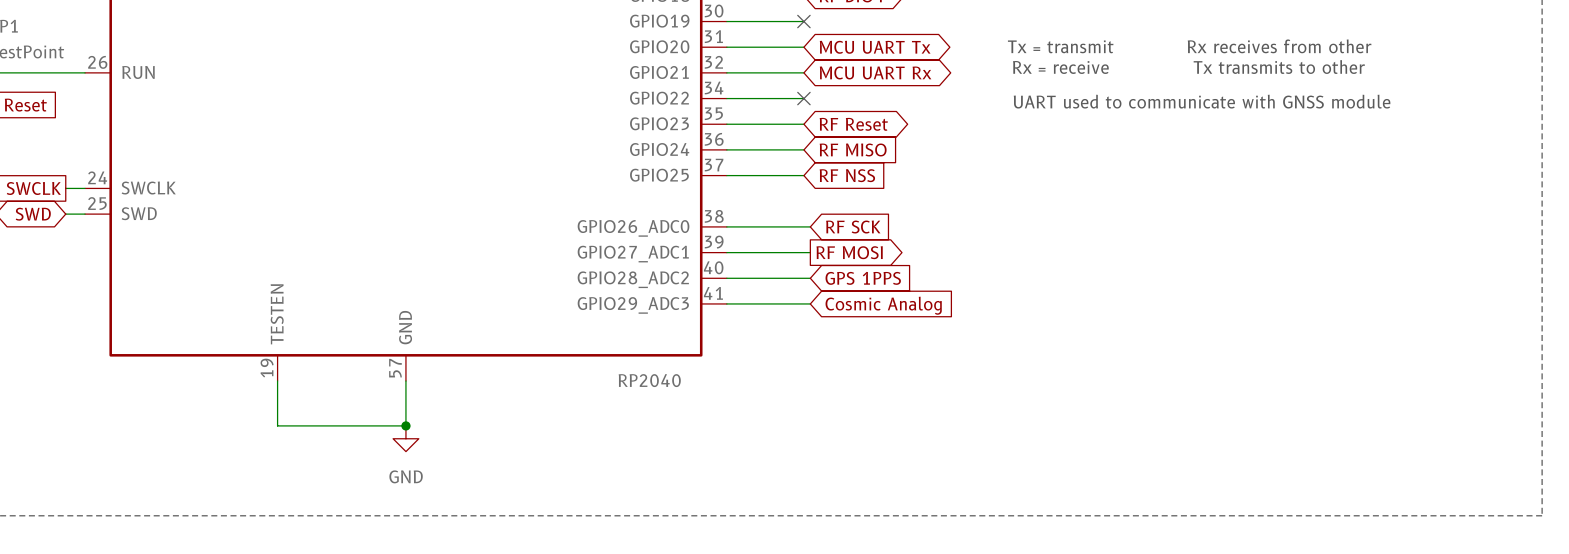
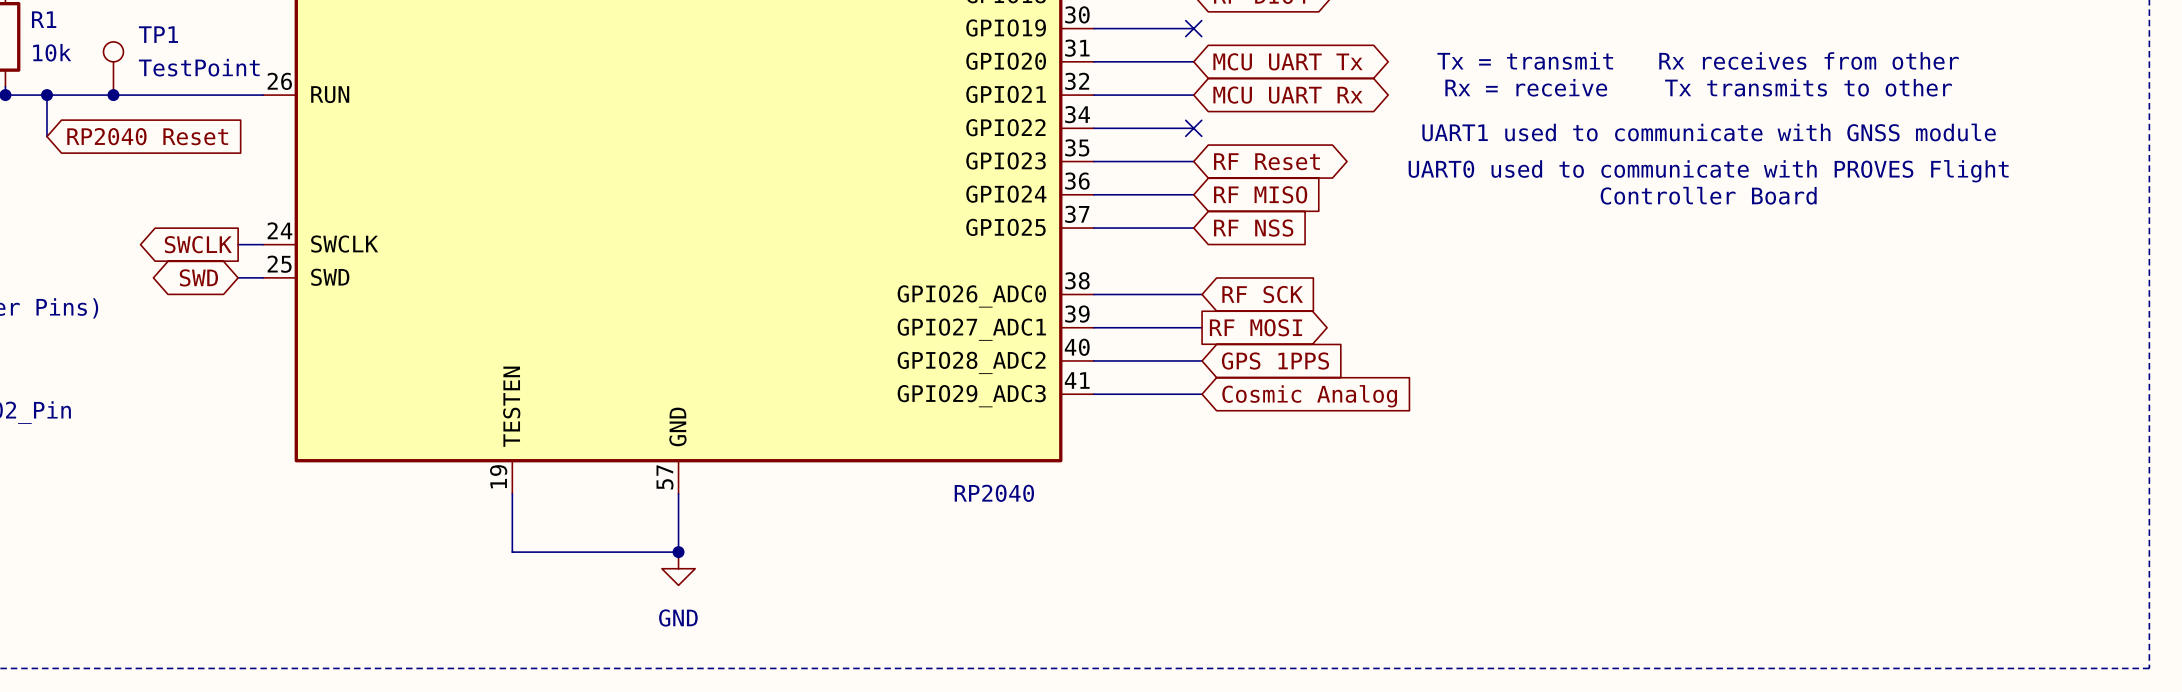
text: UART used to communicate with GNSS module (1202, 101) -> UART1 used to communicate with GNSS module (1709, 132)
text: none -> UART0 used to communicate with PROVES Flight (1708, 171)
text: none -> Controller Board (1708, 195)

